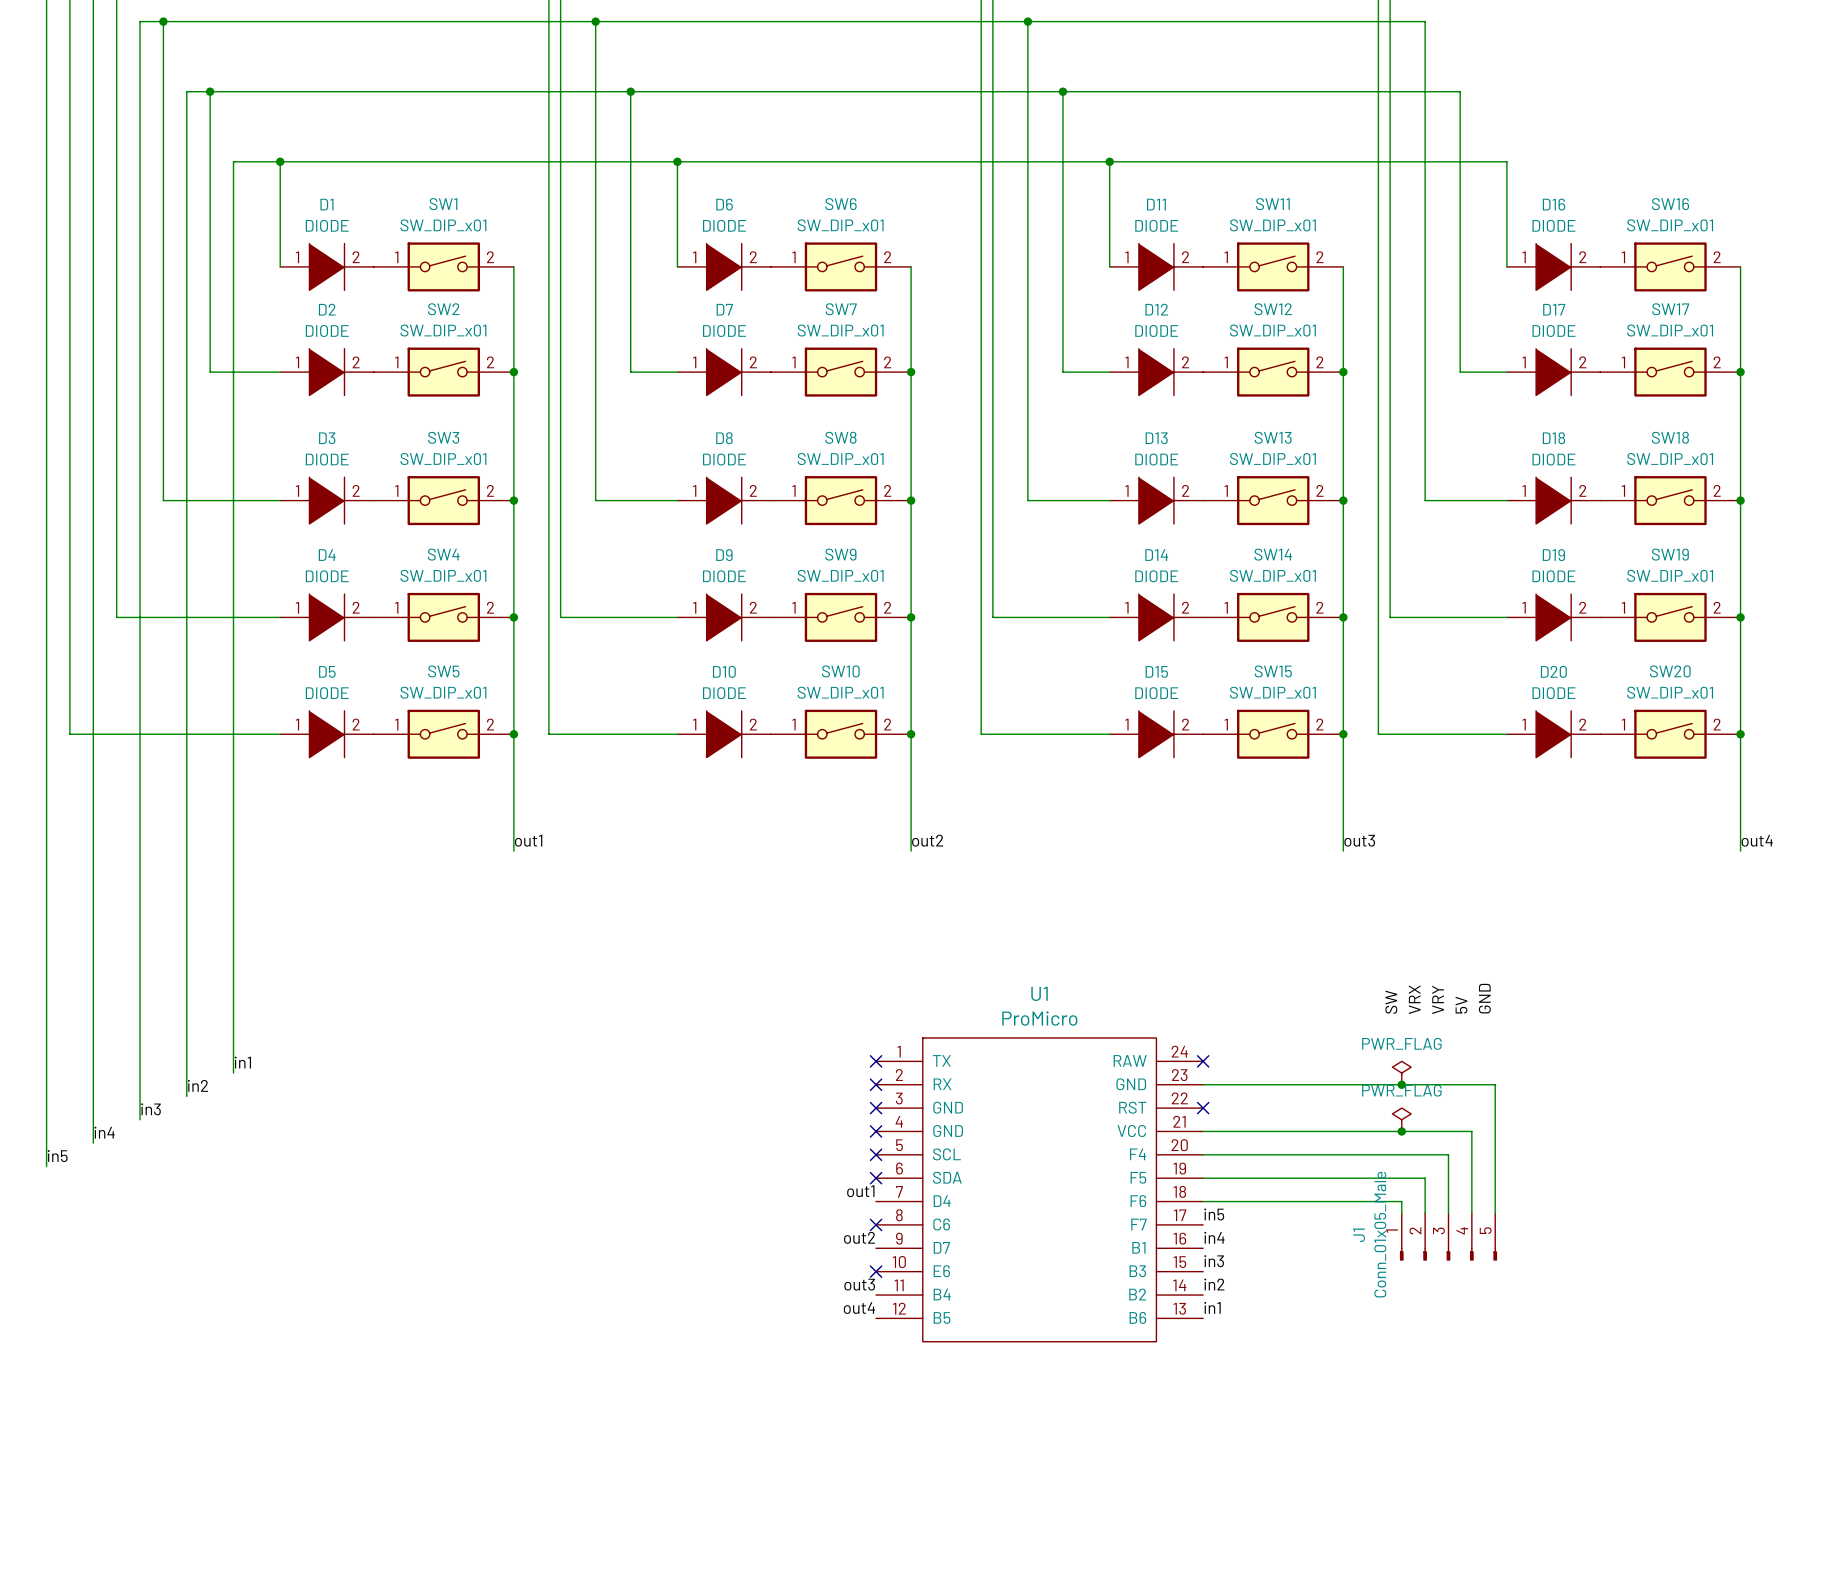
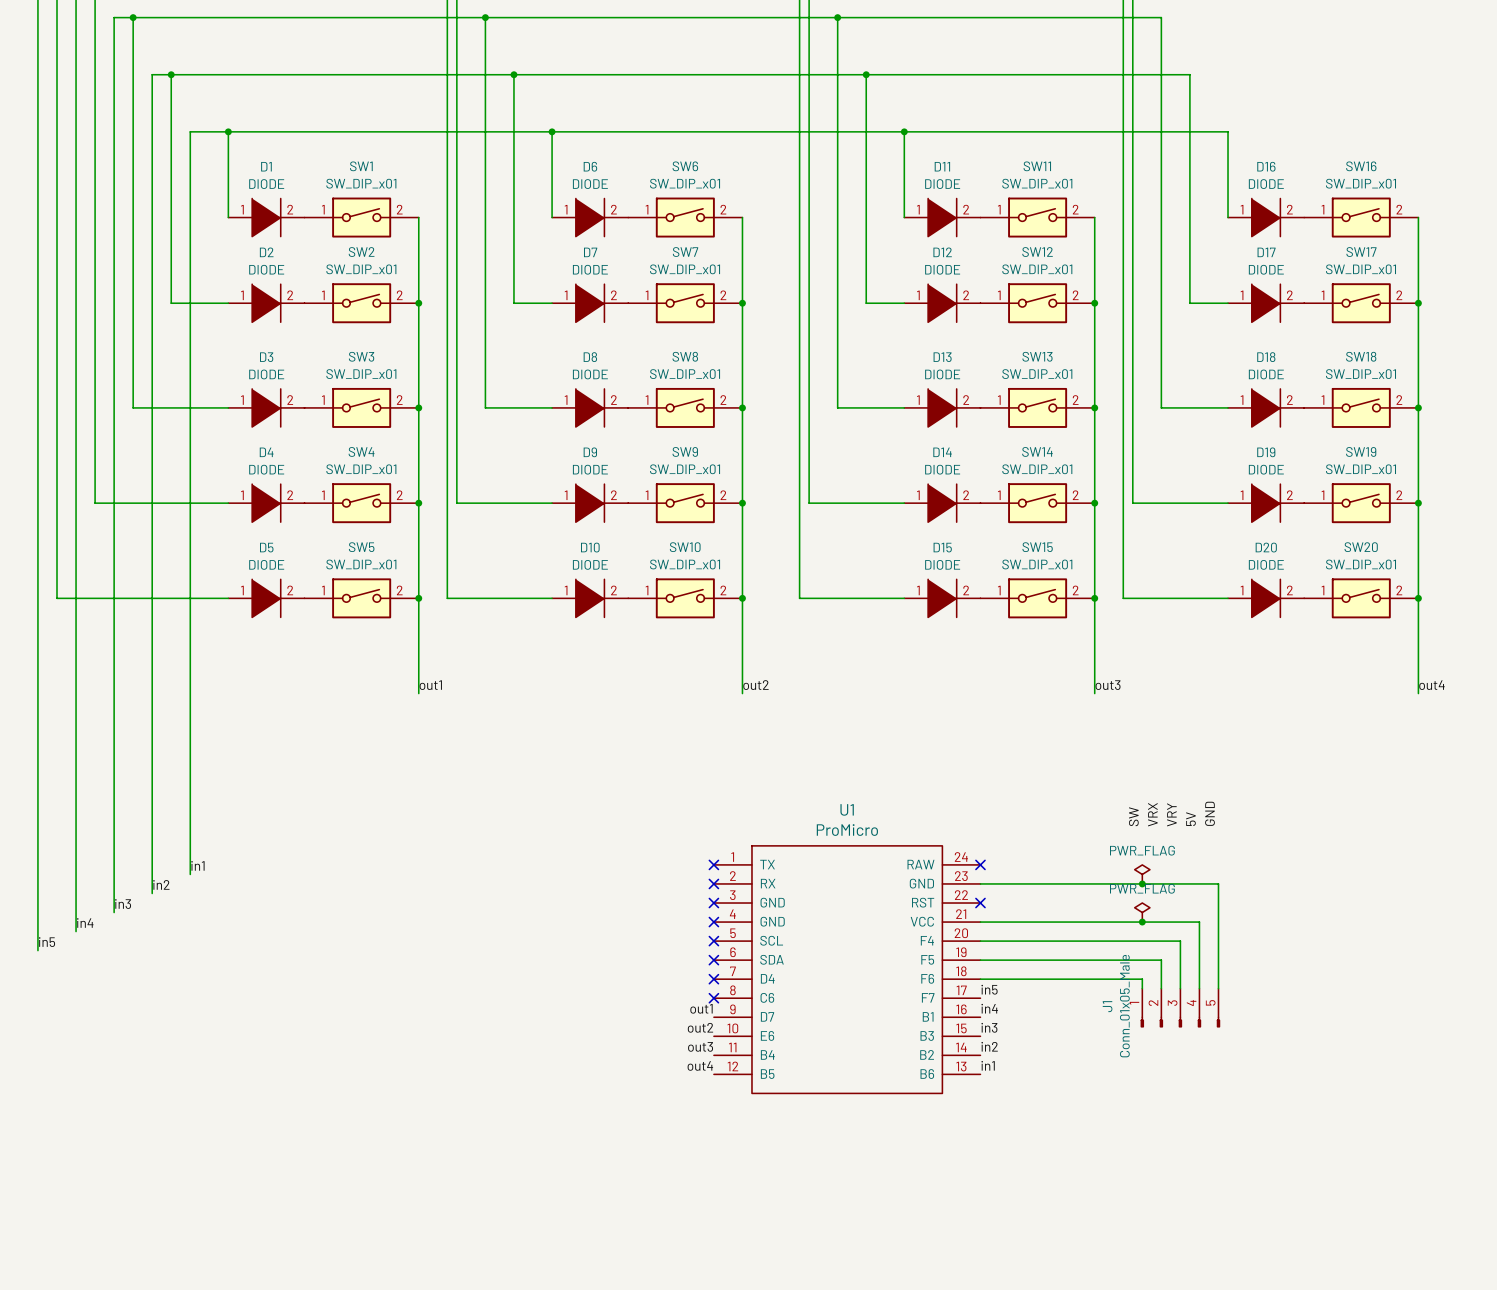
label: out1 (860, 1191) -> none
no-connect mark: none -> (713, 979)
label: out2 (859, 1237) -> out1 (701, 1008)
label: none -> out2 (700, 1027)
no-connect mark: (876, 1271) -> none

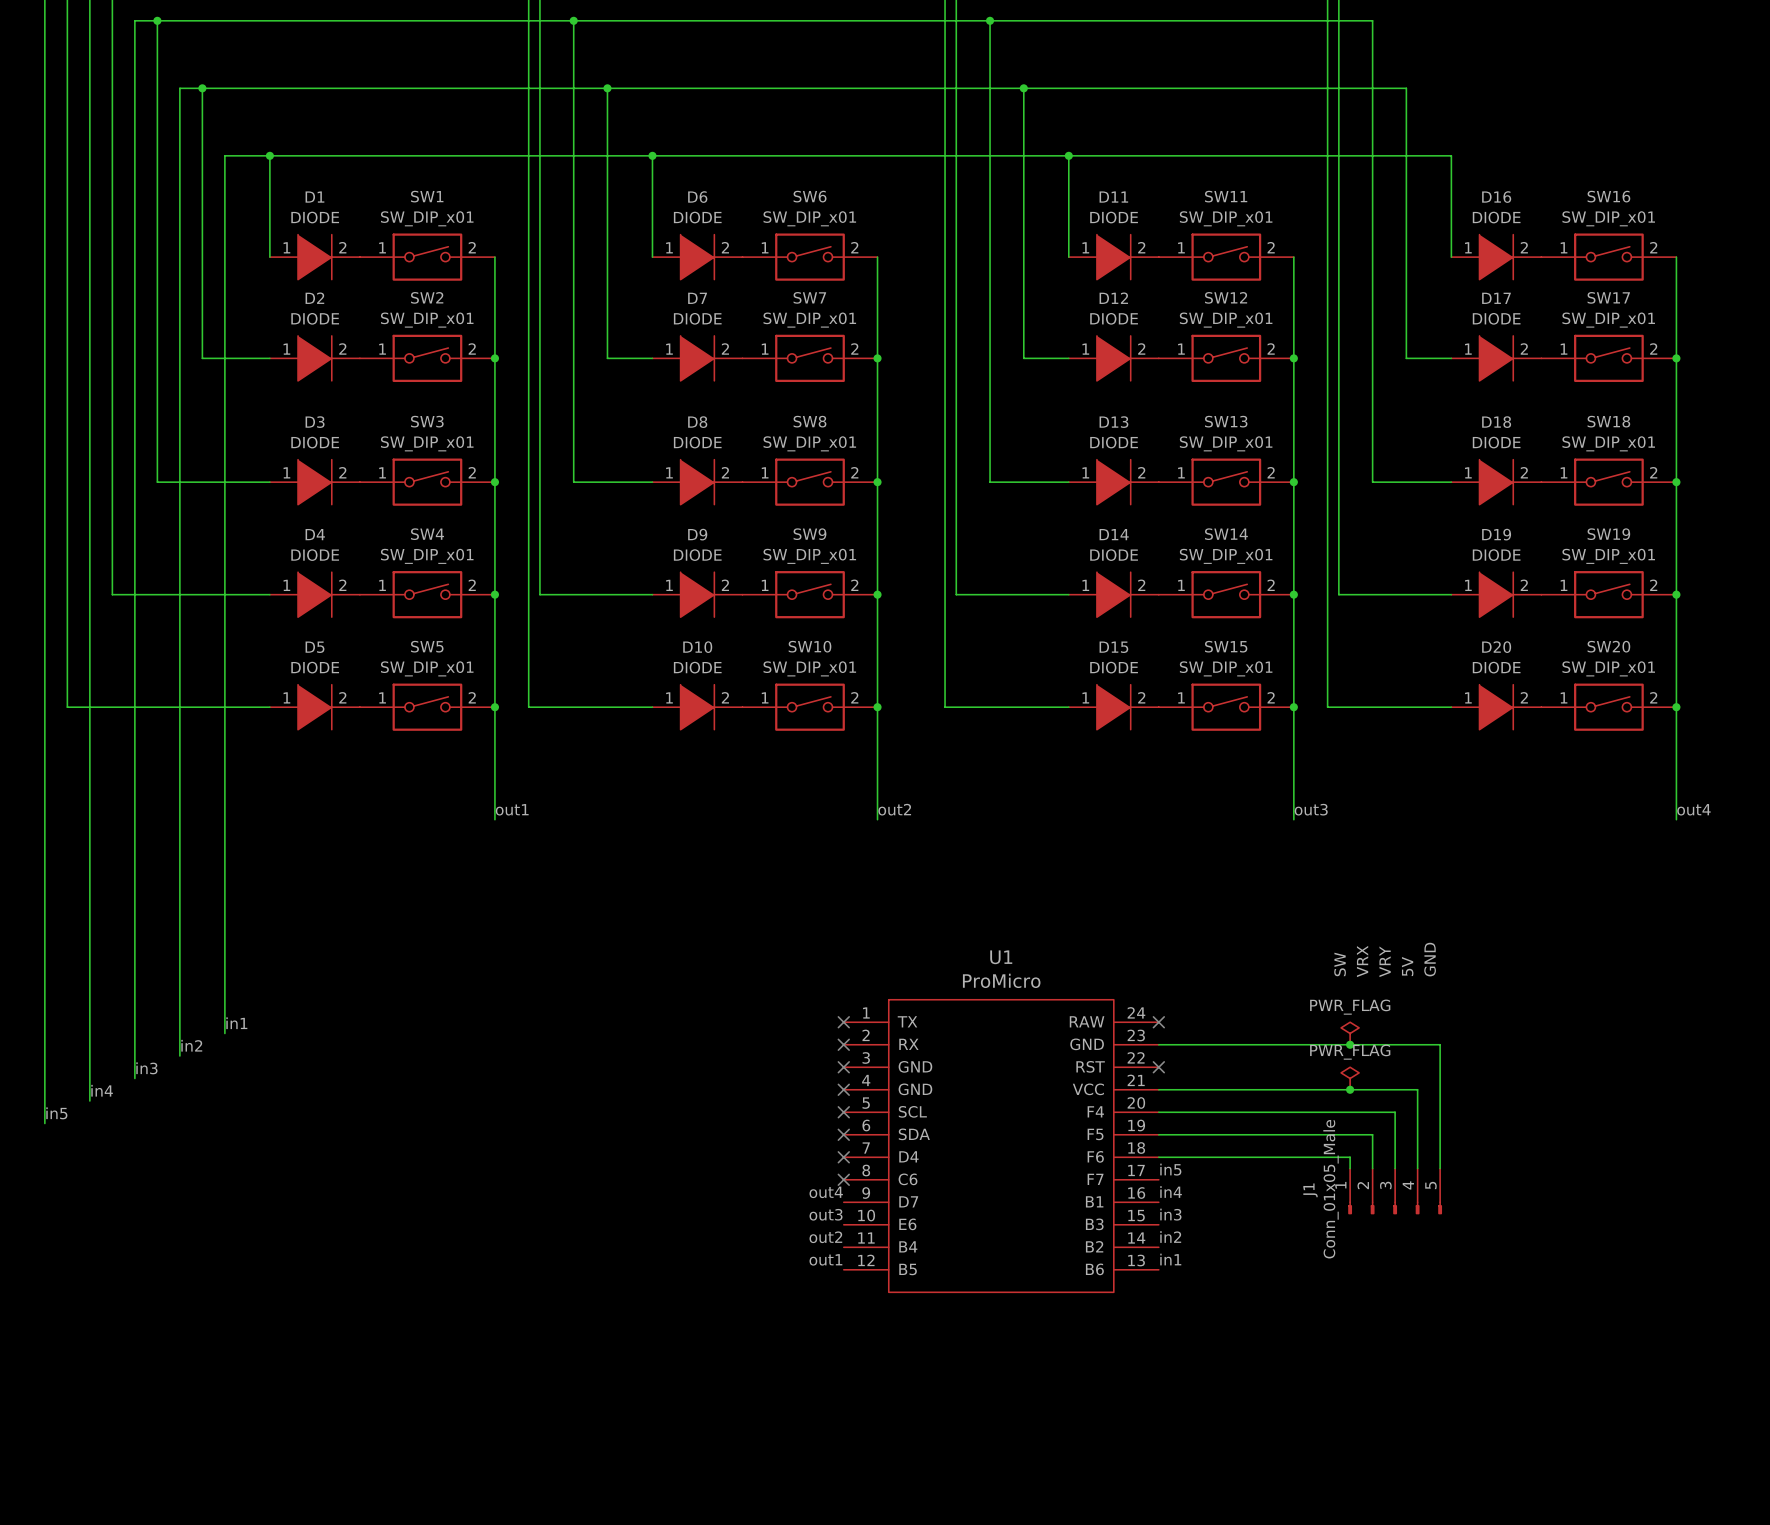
label: out1 (701, 1008) -> out4 (826, 1192)
label: out2 (700, 1027) -> out3 (826, 1214)
label: out3 (700, 1046) -> out2 (825, 1237)
label: out4 (700, 1065) -> out1 (825, 1259)

